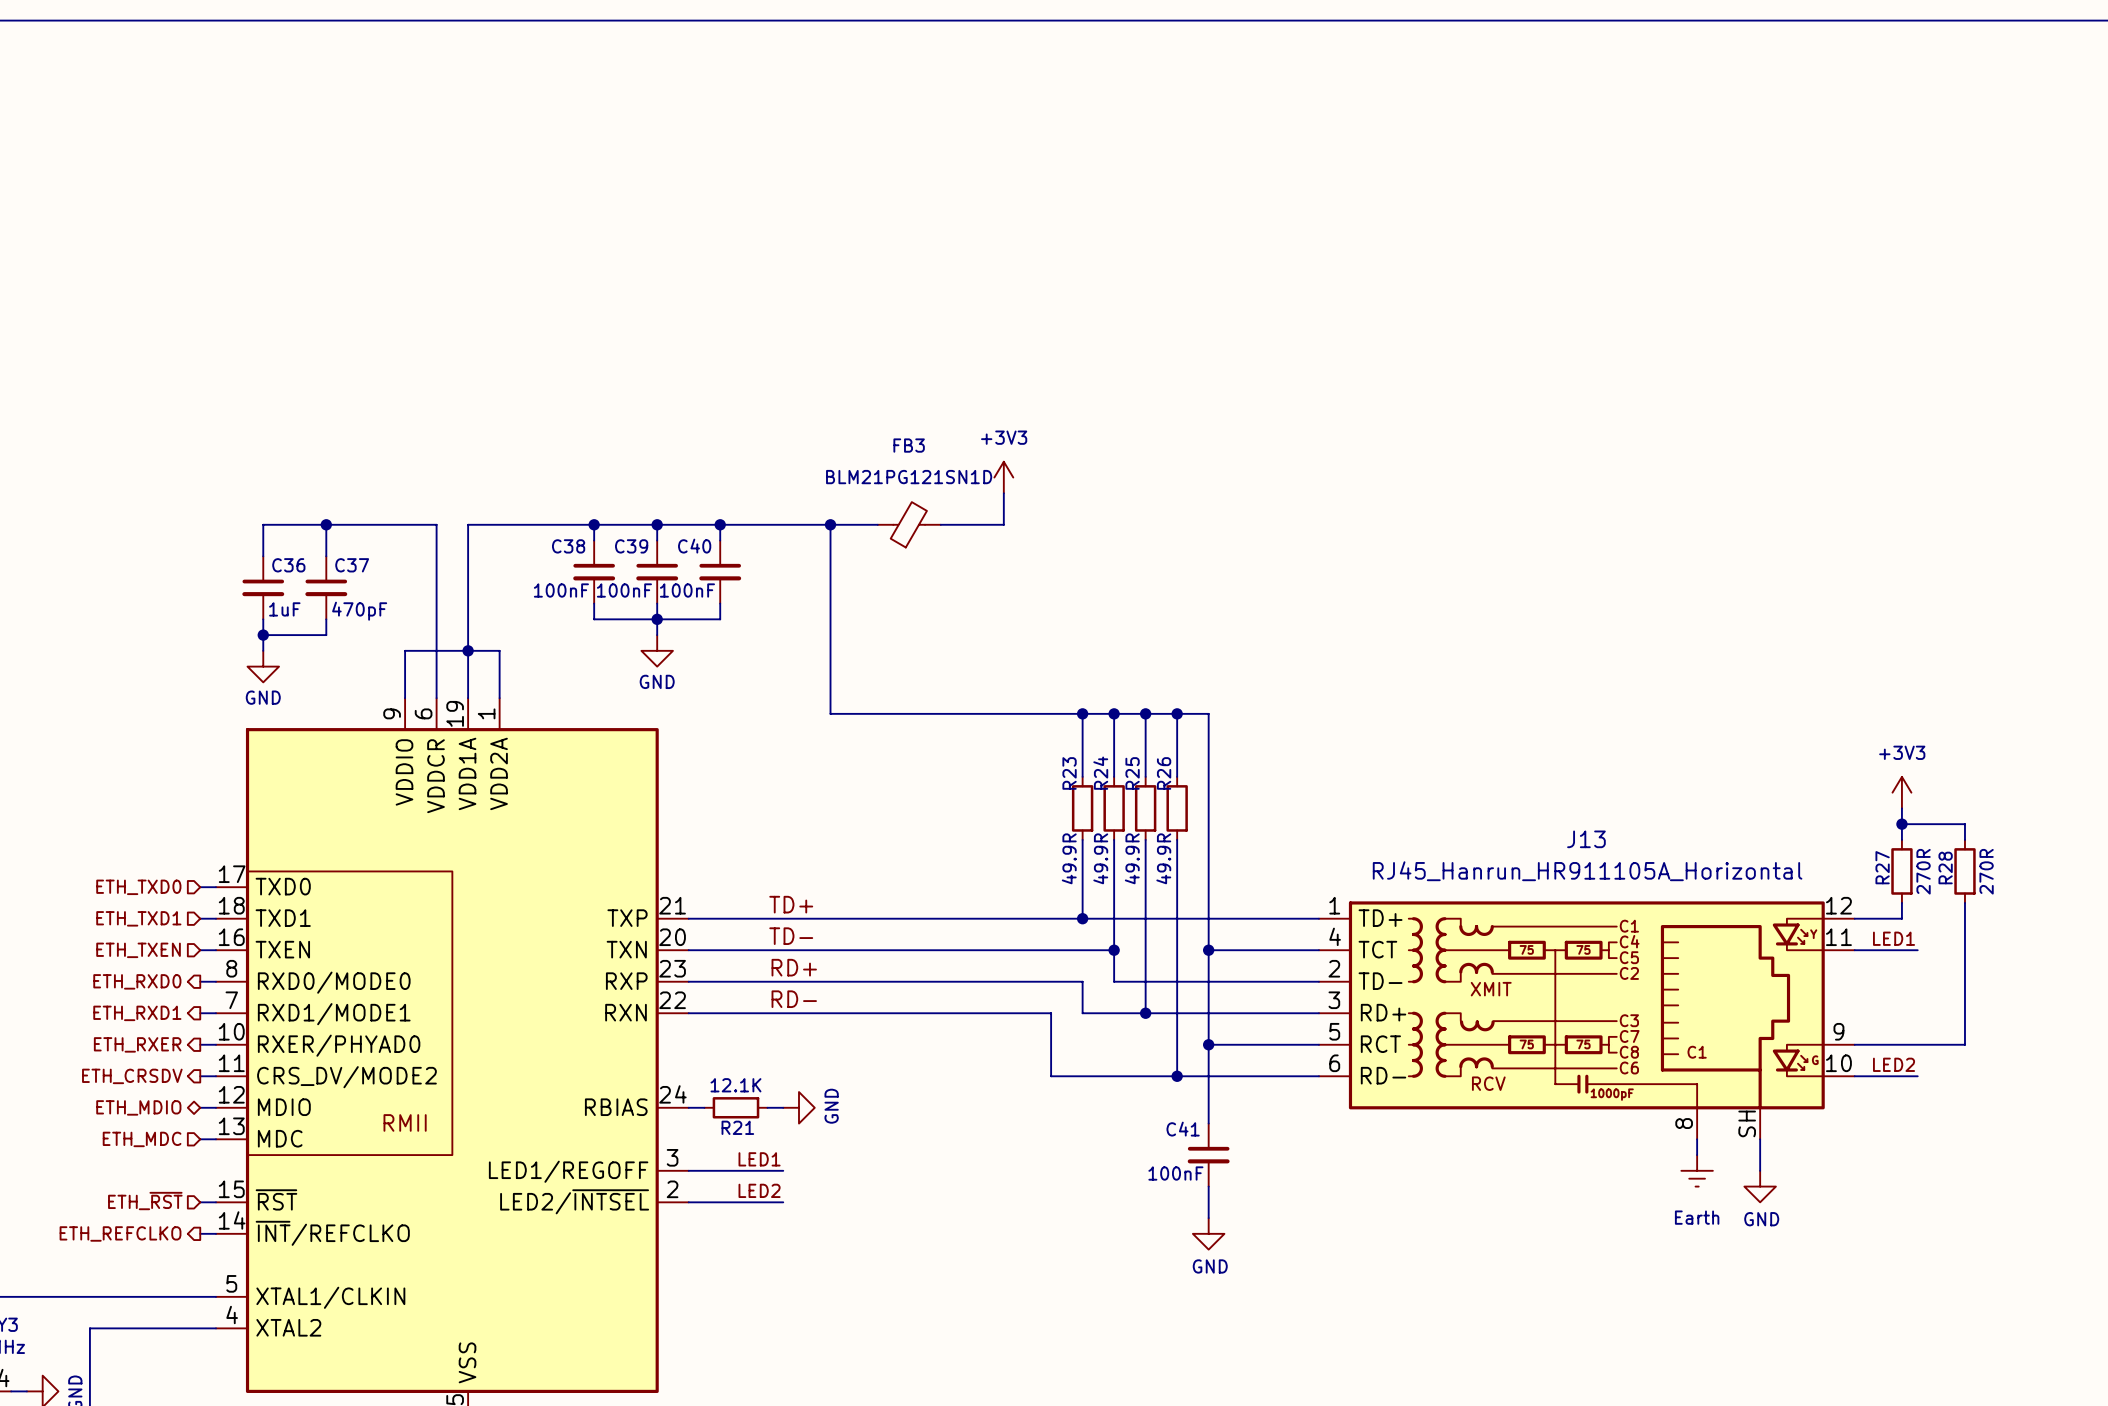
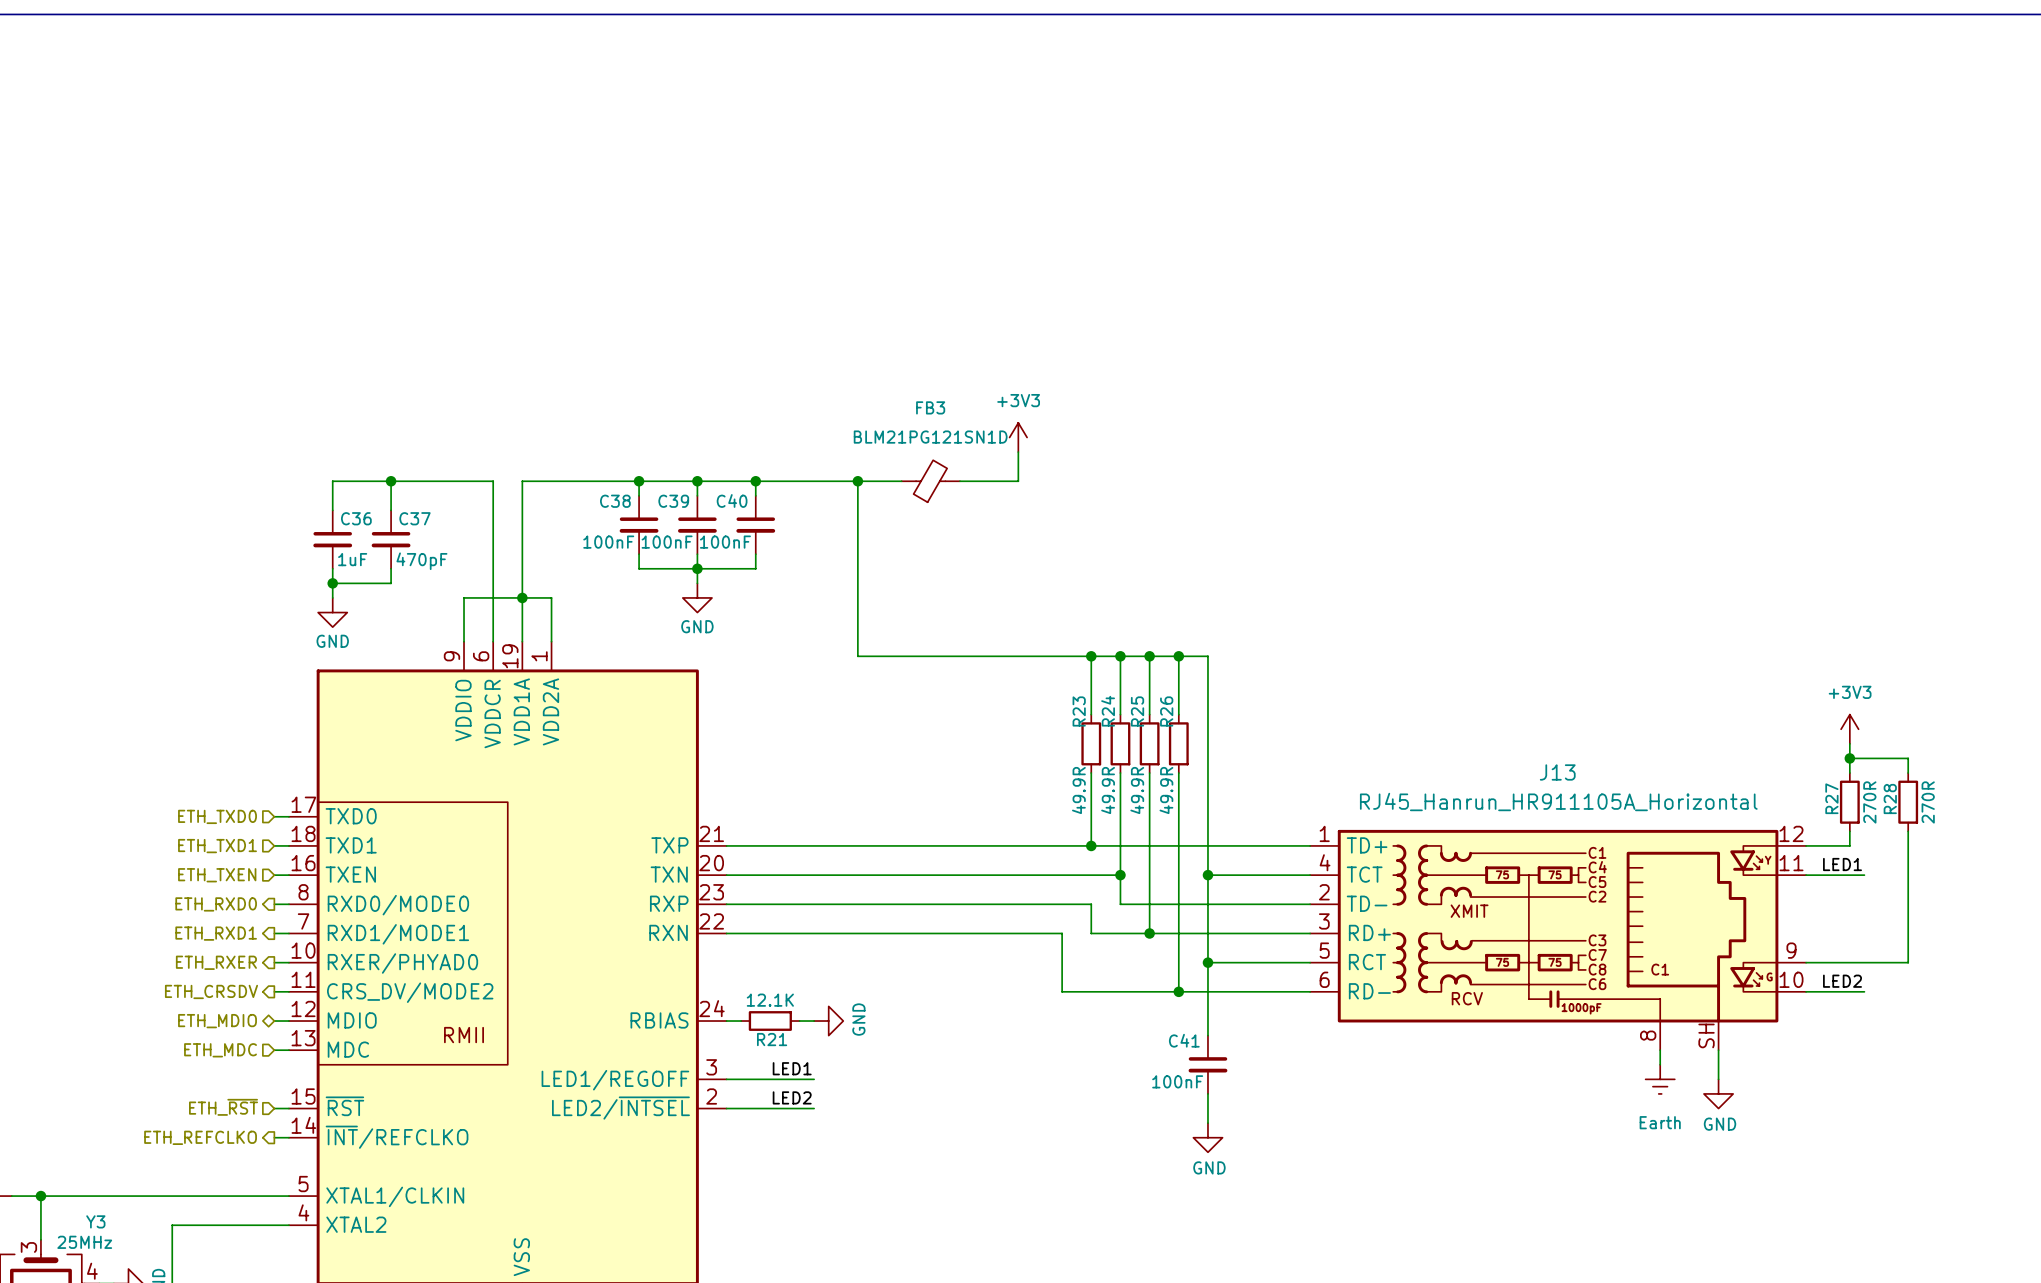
label: TD+ (791, 904) -> none
label: TD- (791, 936) -> none
label: RD+ (794, 967) -> none
label: RD- (794, 999) -> none

